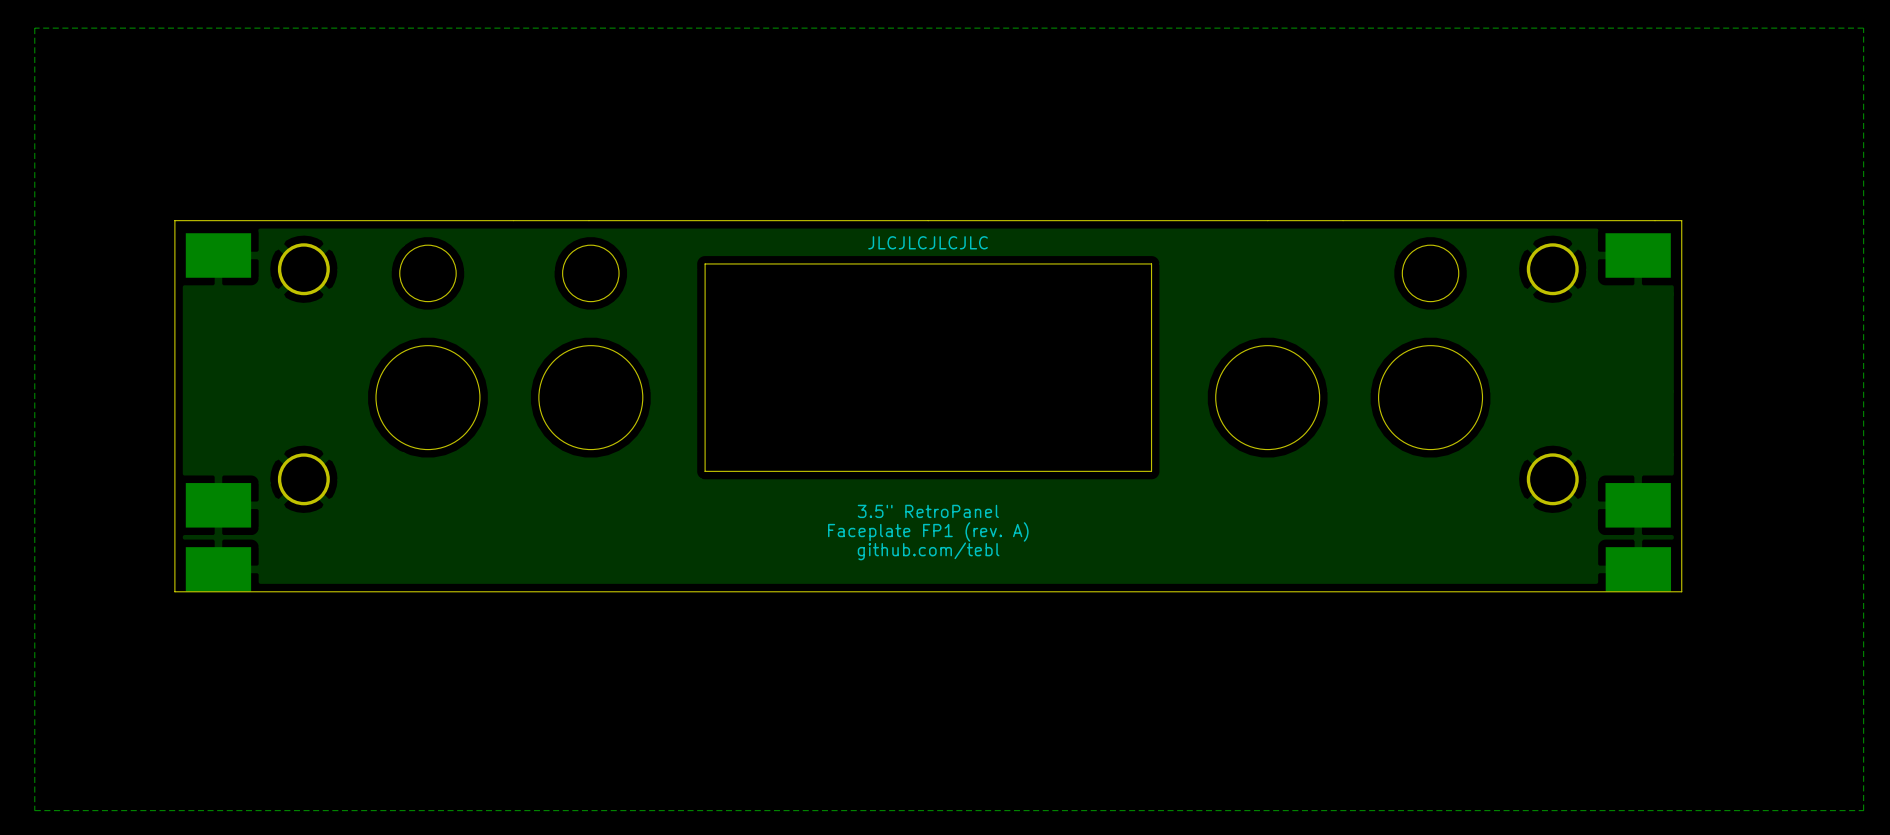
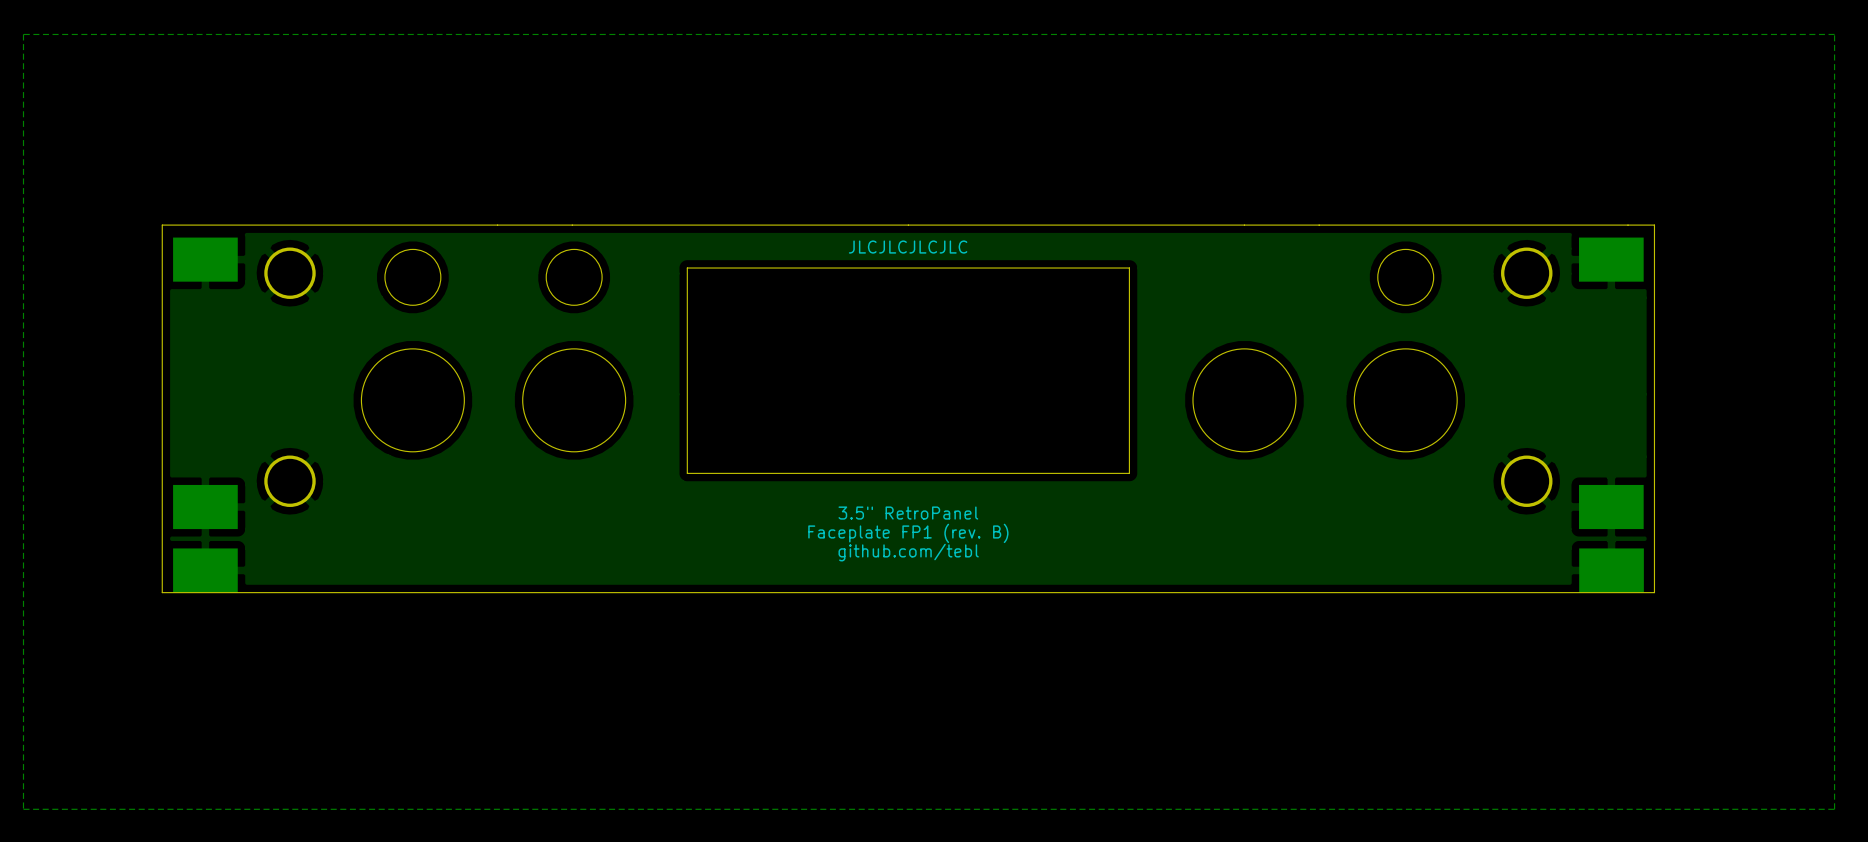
text: Faceplate FP1 (rev. A) (928, 531) -> Faceplate FP1 (rev. B) (908, 533)

